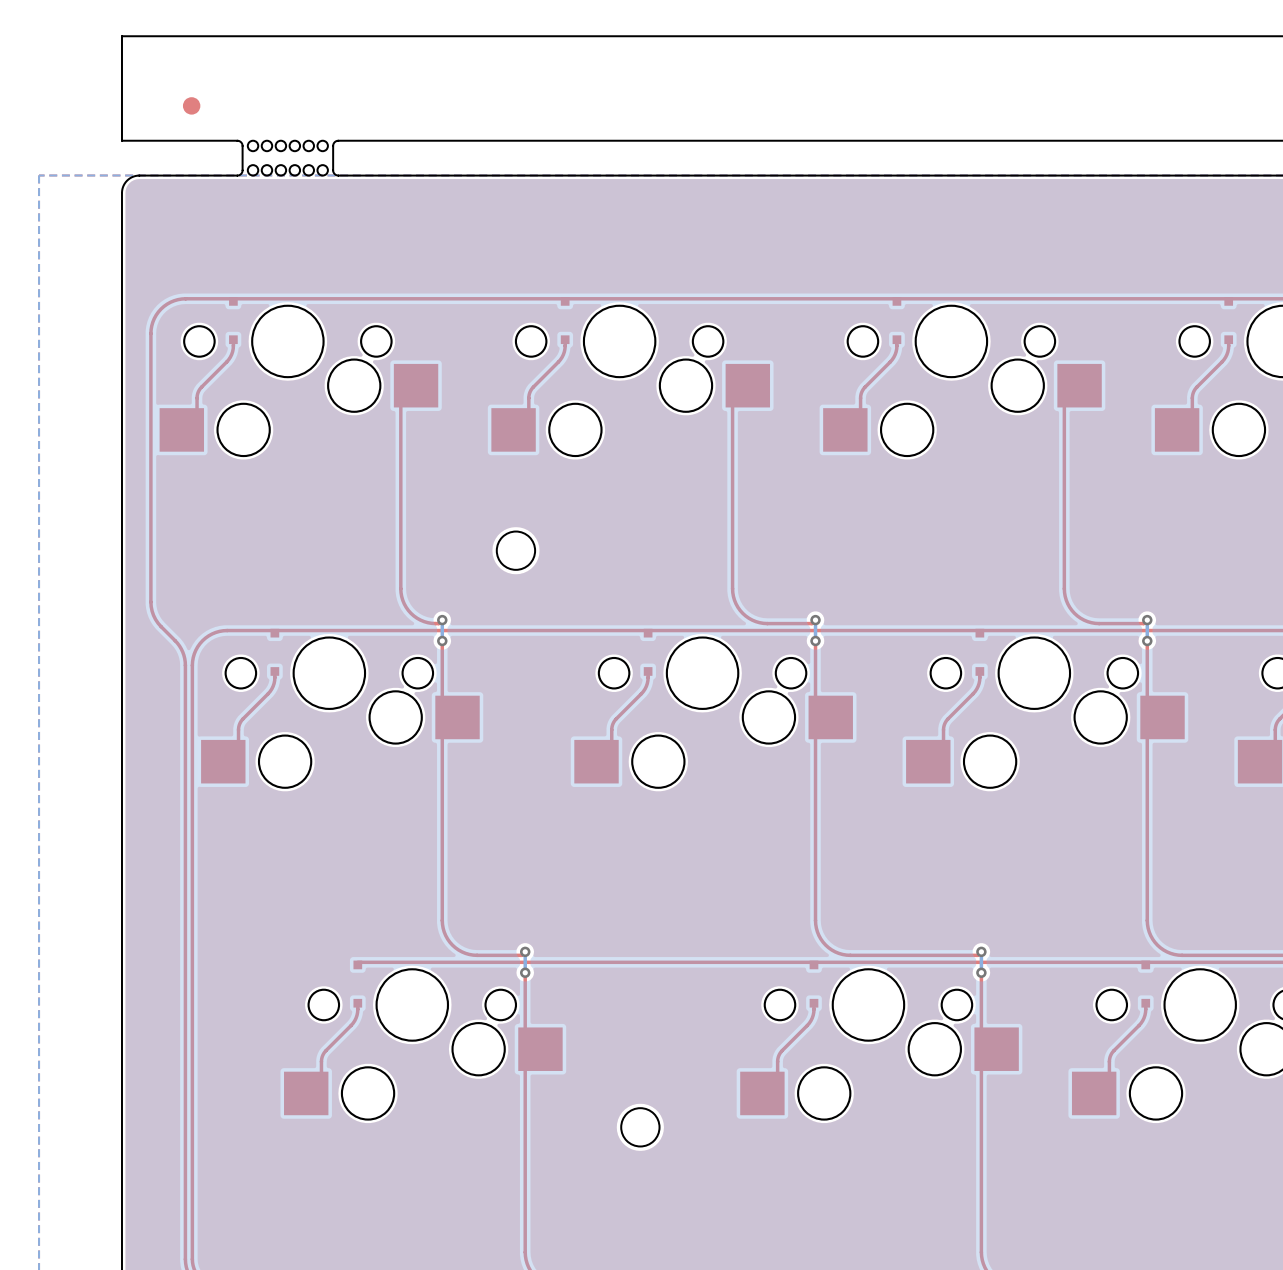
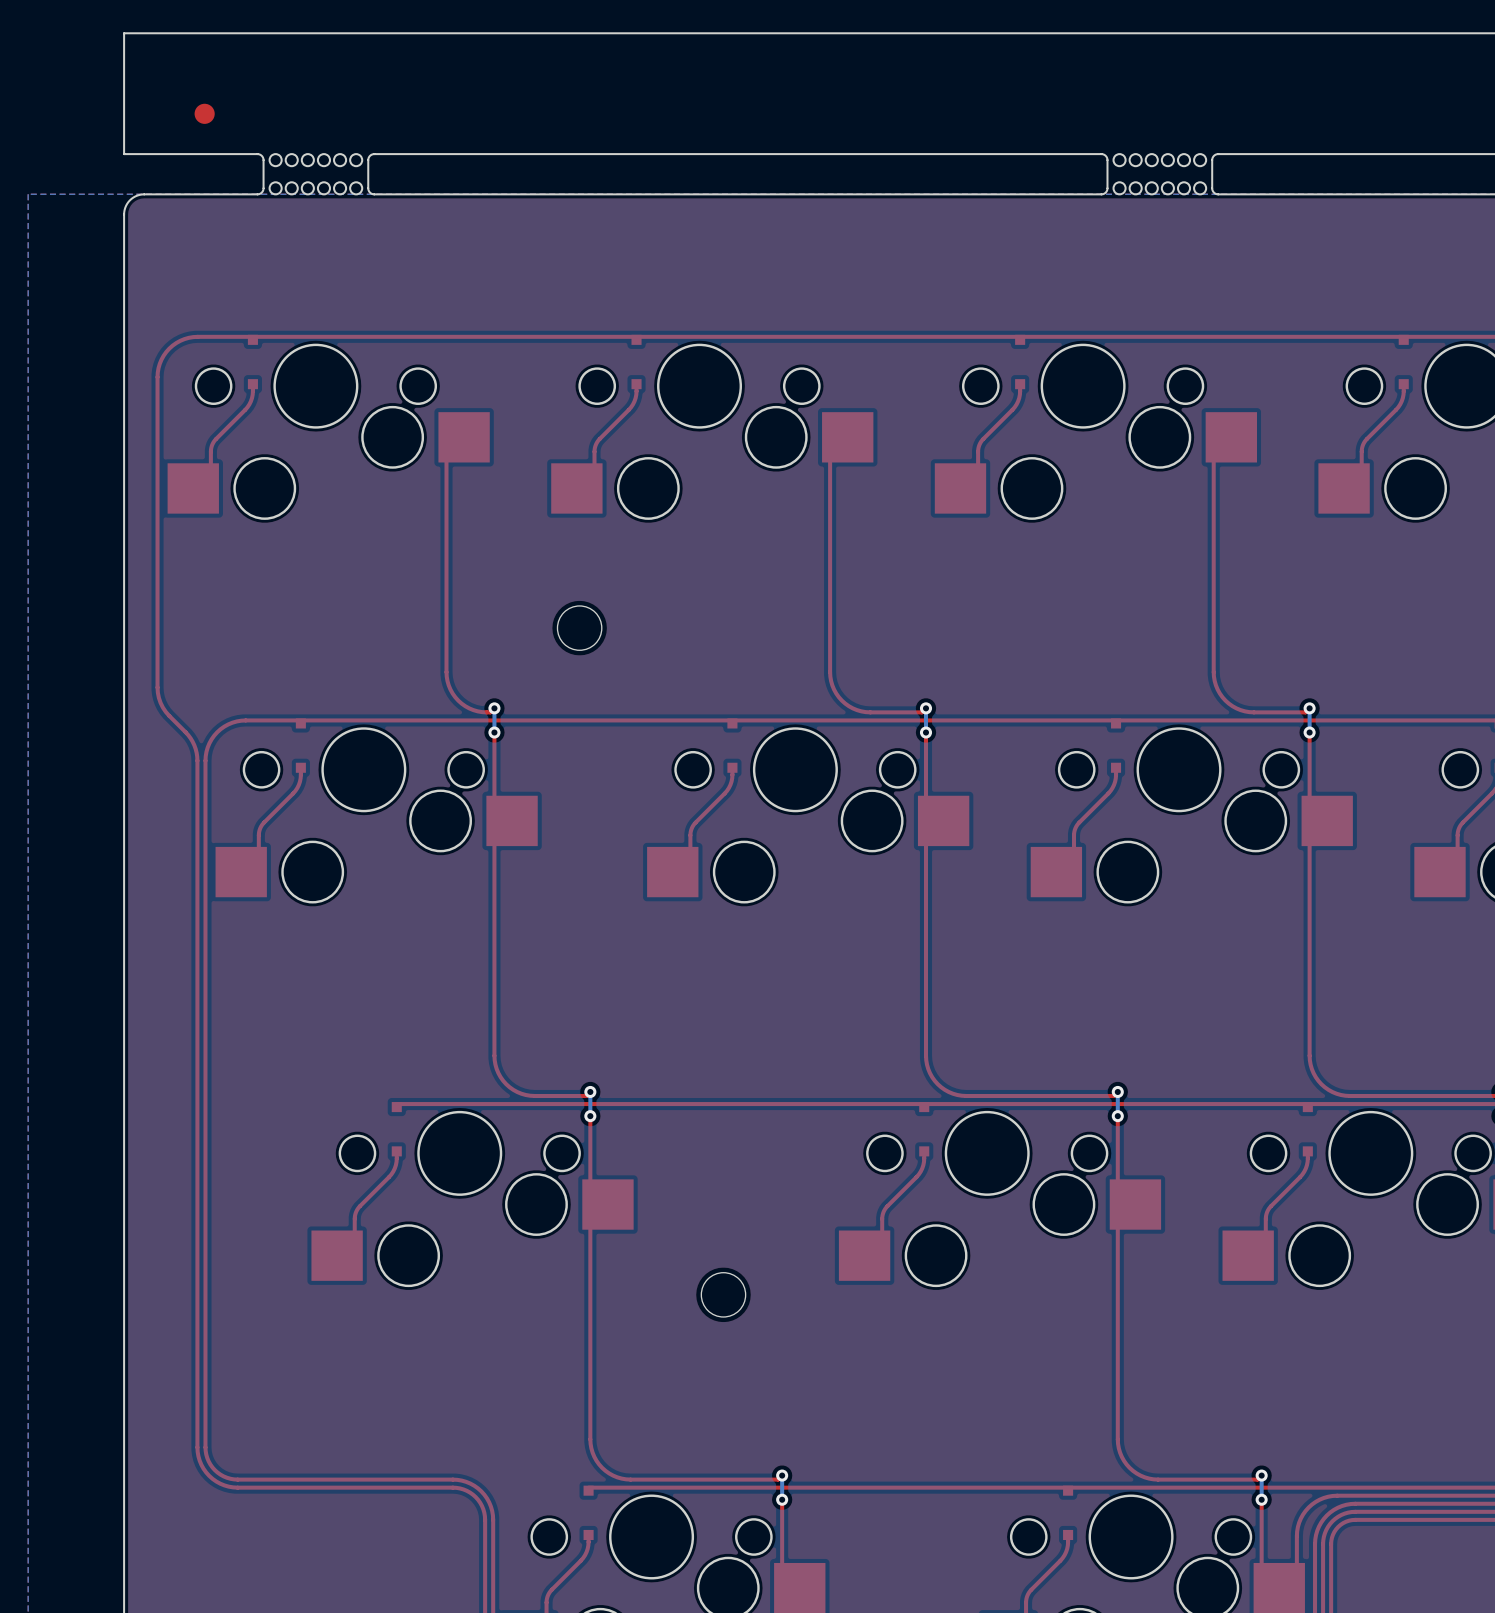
round board edge: none -> [1112, 153, 1127, 168]
round board edge: none -> [1128, 153, 1143, 168]
round board edge: none -> [1144, 153, 1159, 168]
round board edge: none -> [1160, 153, 1175, 168]
round board edge: none -> [1176, 153, 1192, 168]
round board edge: none -> [1193, 153, 1208, 168]
board edge: (1068, 140) (967, 140) -> (1218, 154) (1213, 155) (1212, 160) (1212, 189) (1218, 194)
round board edge: none -> [1112, 181, 1127, 196]
round board edge: none -> [1128, 181, 1143, 196]
round board edge: none -> [1144, 181, 1159, 196]
round board edge: none -> [1160, 181, 1175, 196]
round board edge: none -> [1176, 181, 1192, 196]
round board edge: none -> [1193, 181, 1208, 196]
board edge: (1068, 175) (967, 175) -> (1101, 154) (1105, 155) (1107, 160) (1107, 189) (1101, 194)

